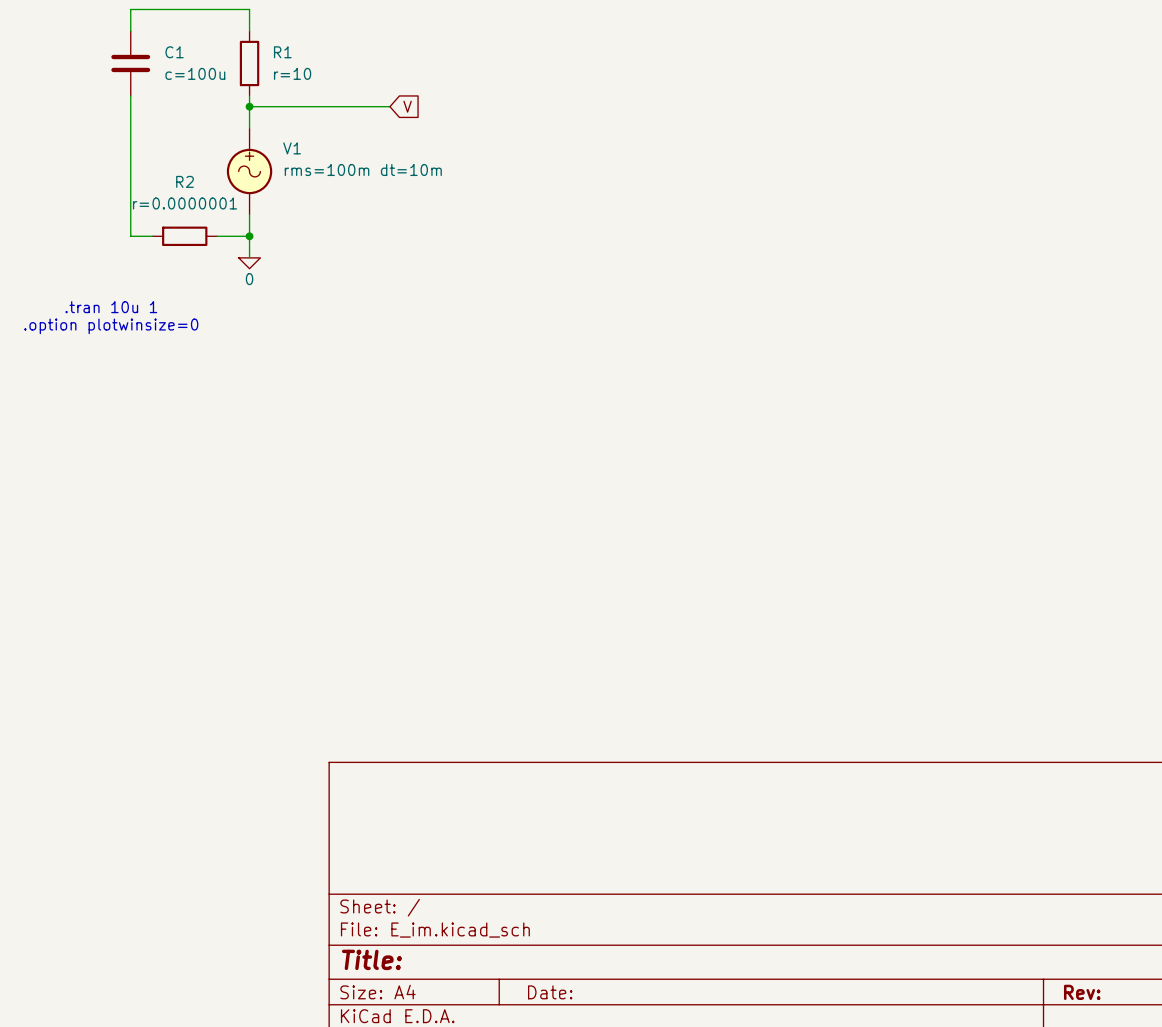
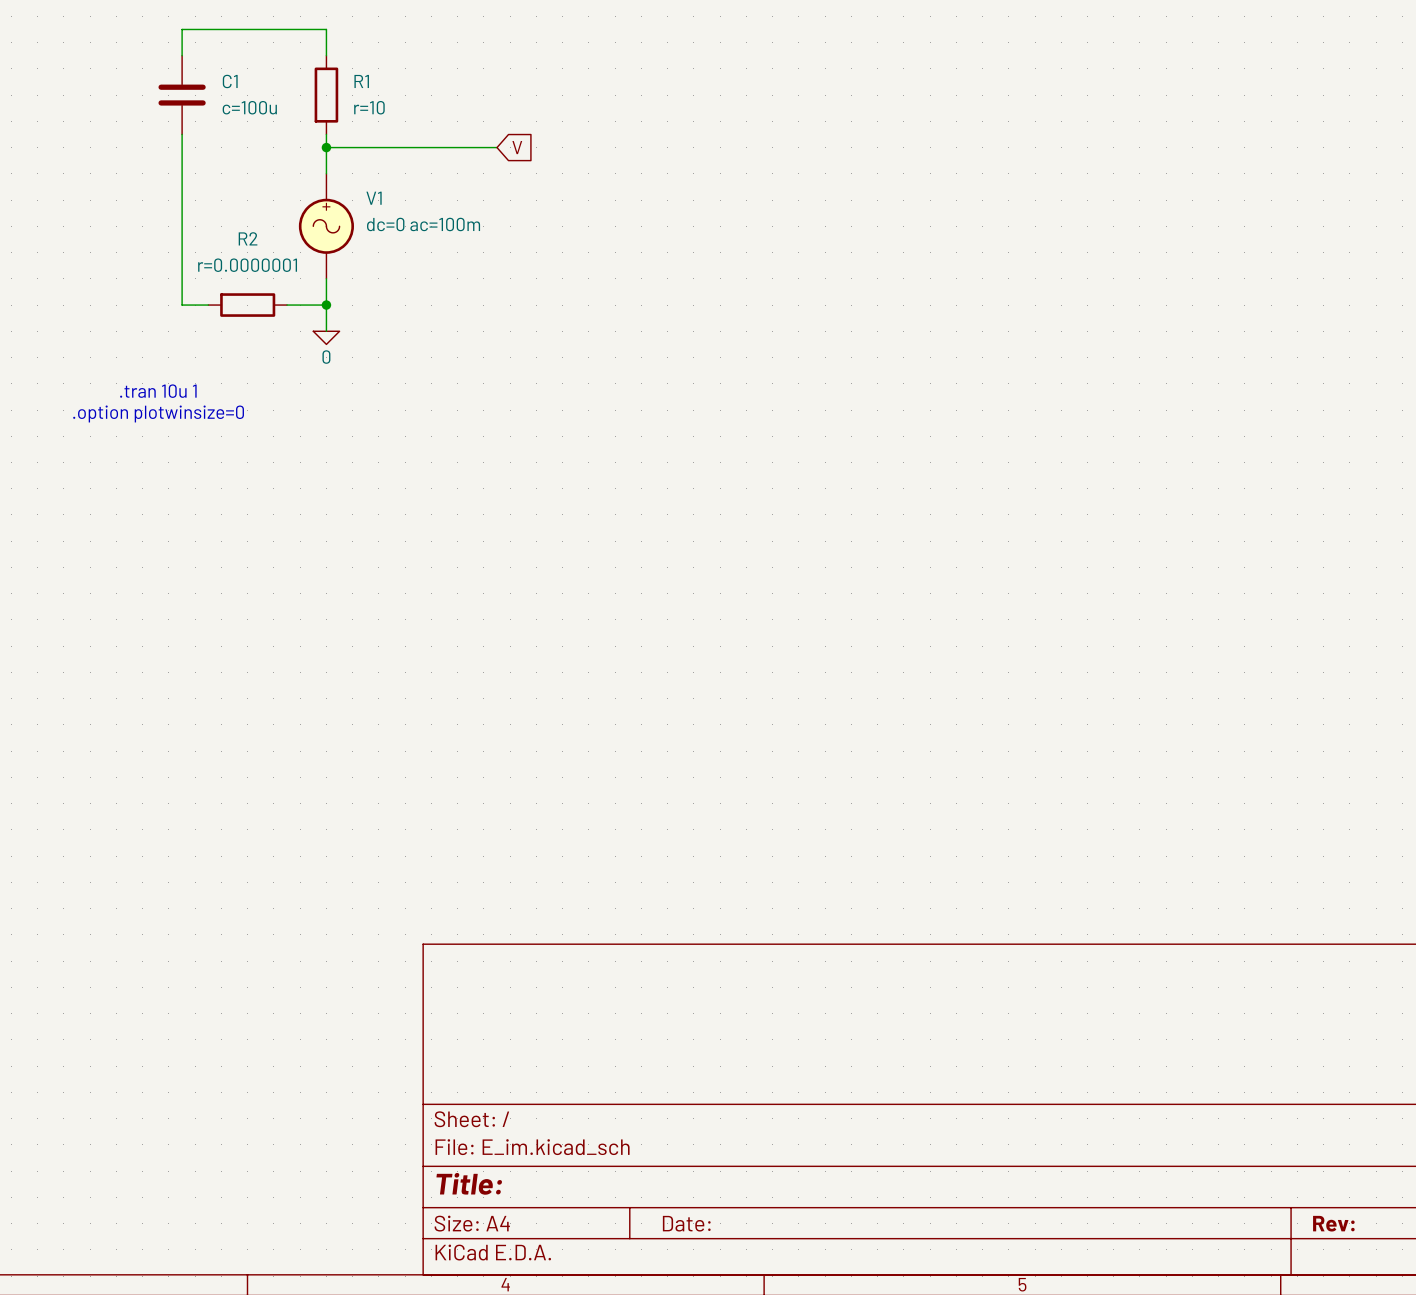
V1 value: rms=100m dt=10m (363, 169) -> dc=0 ac=100m (423, 224)

